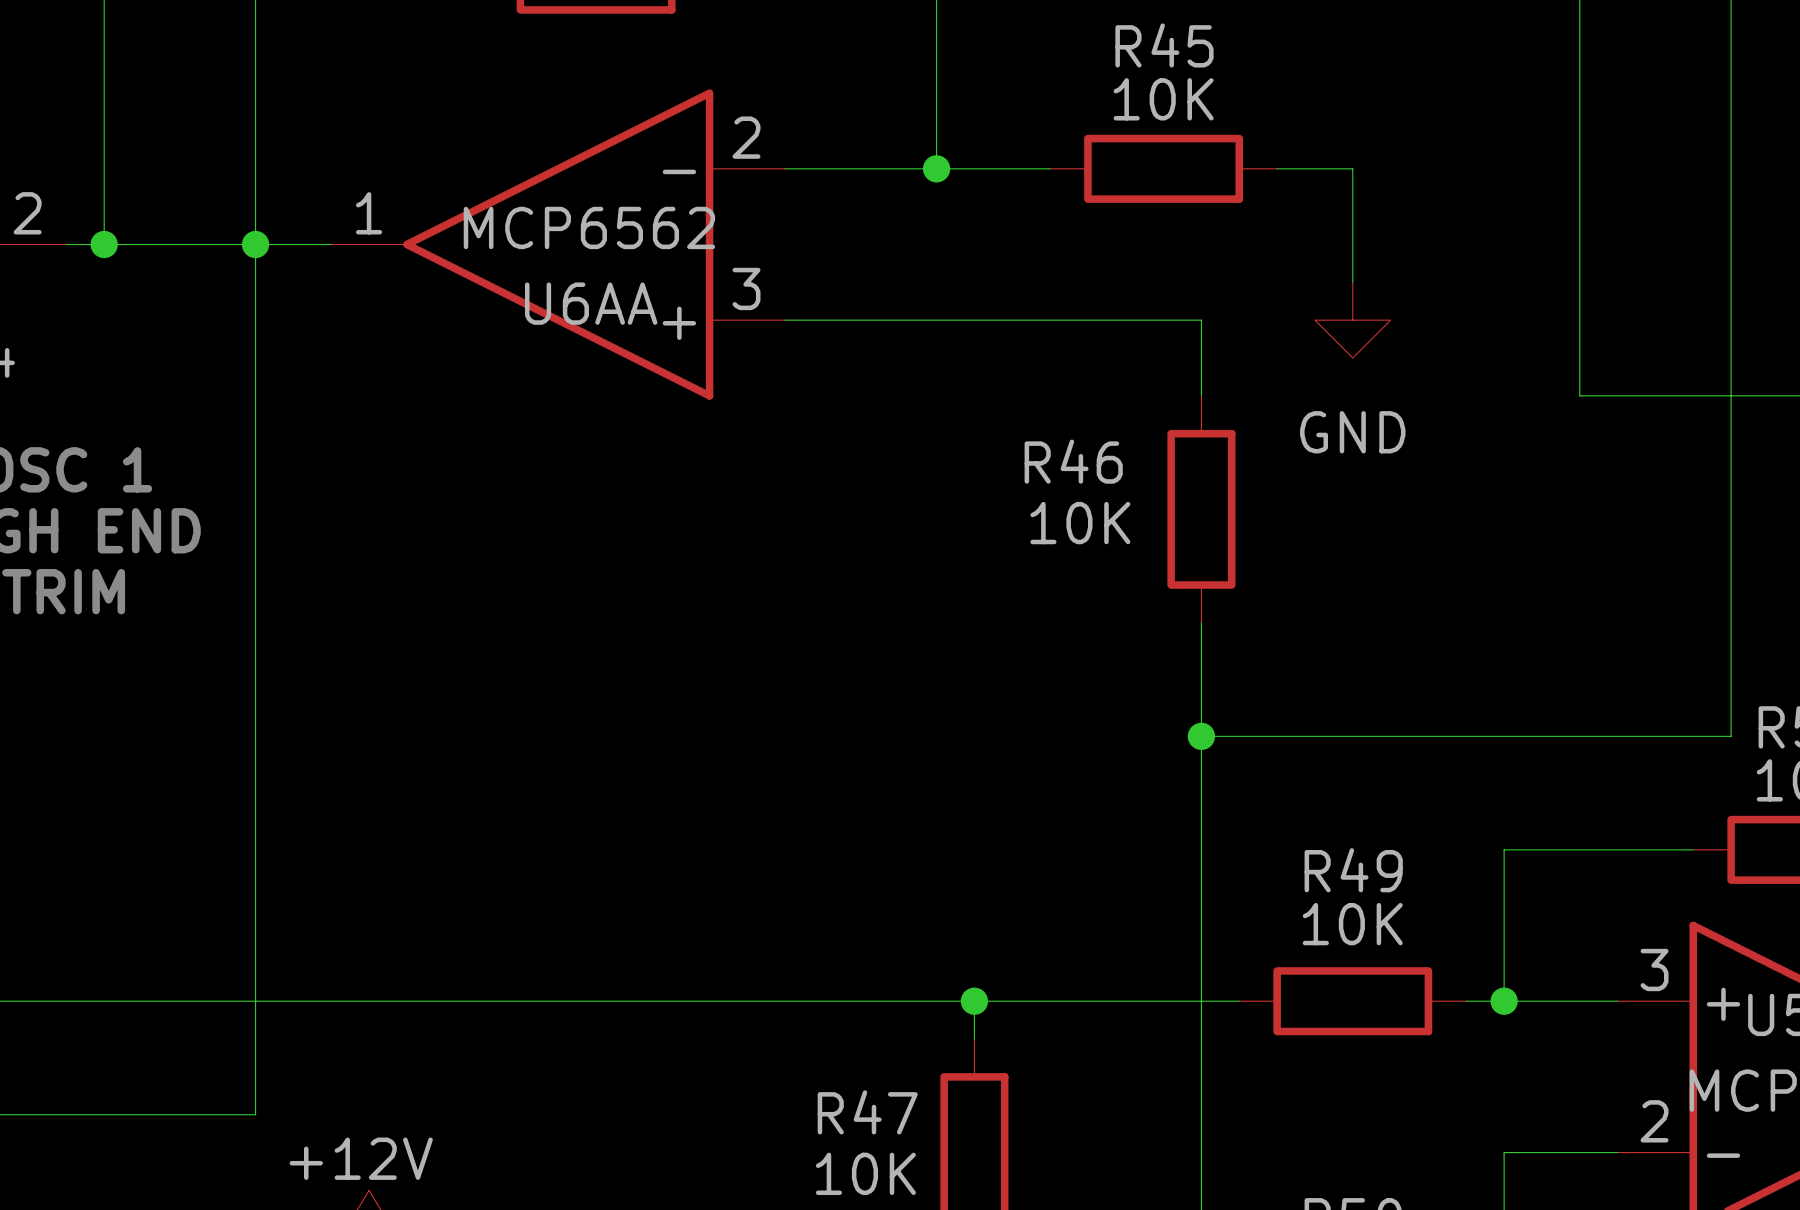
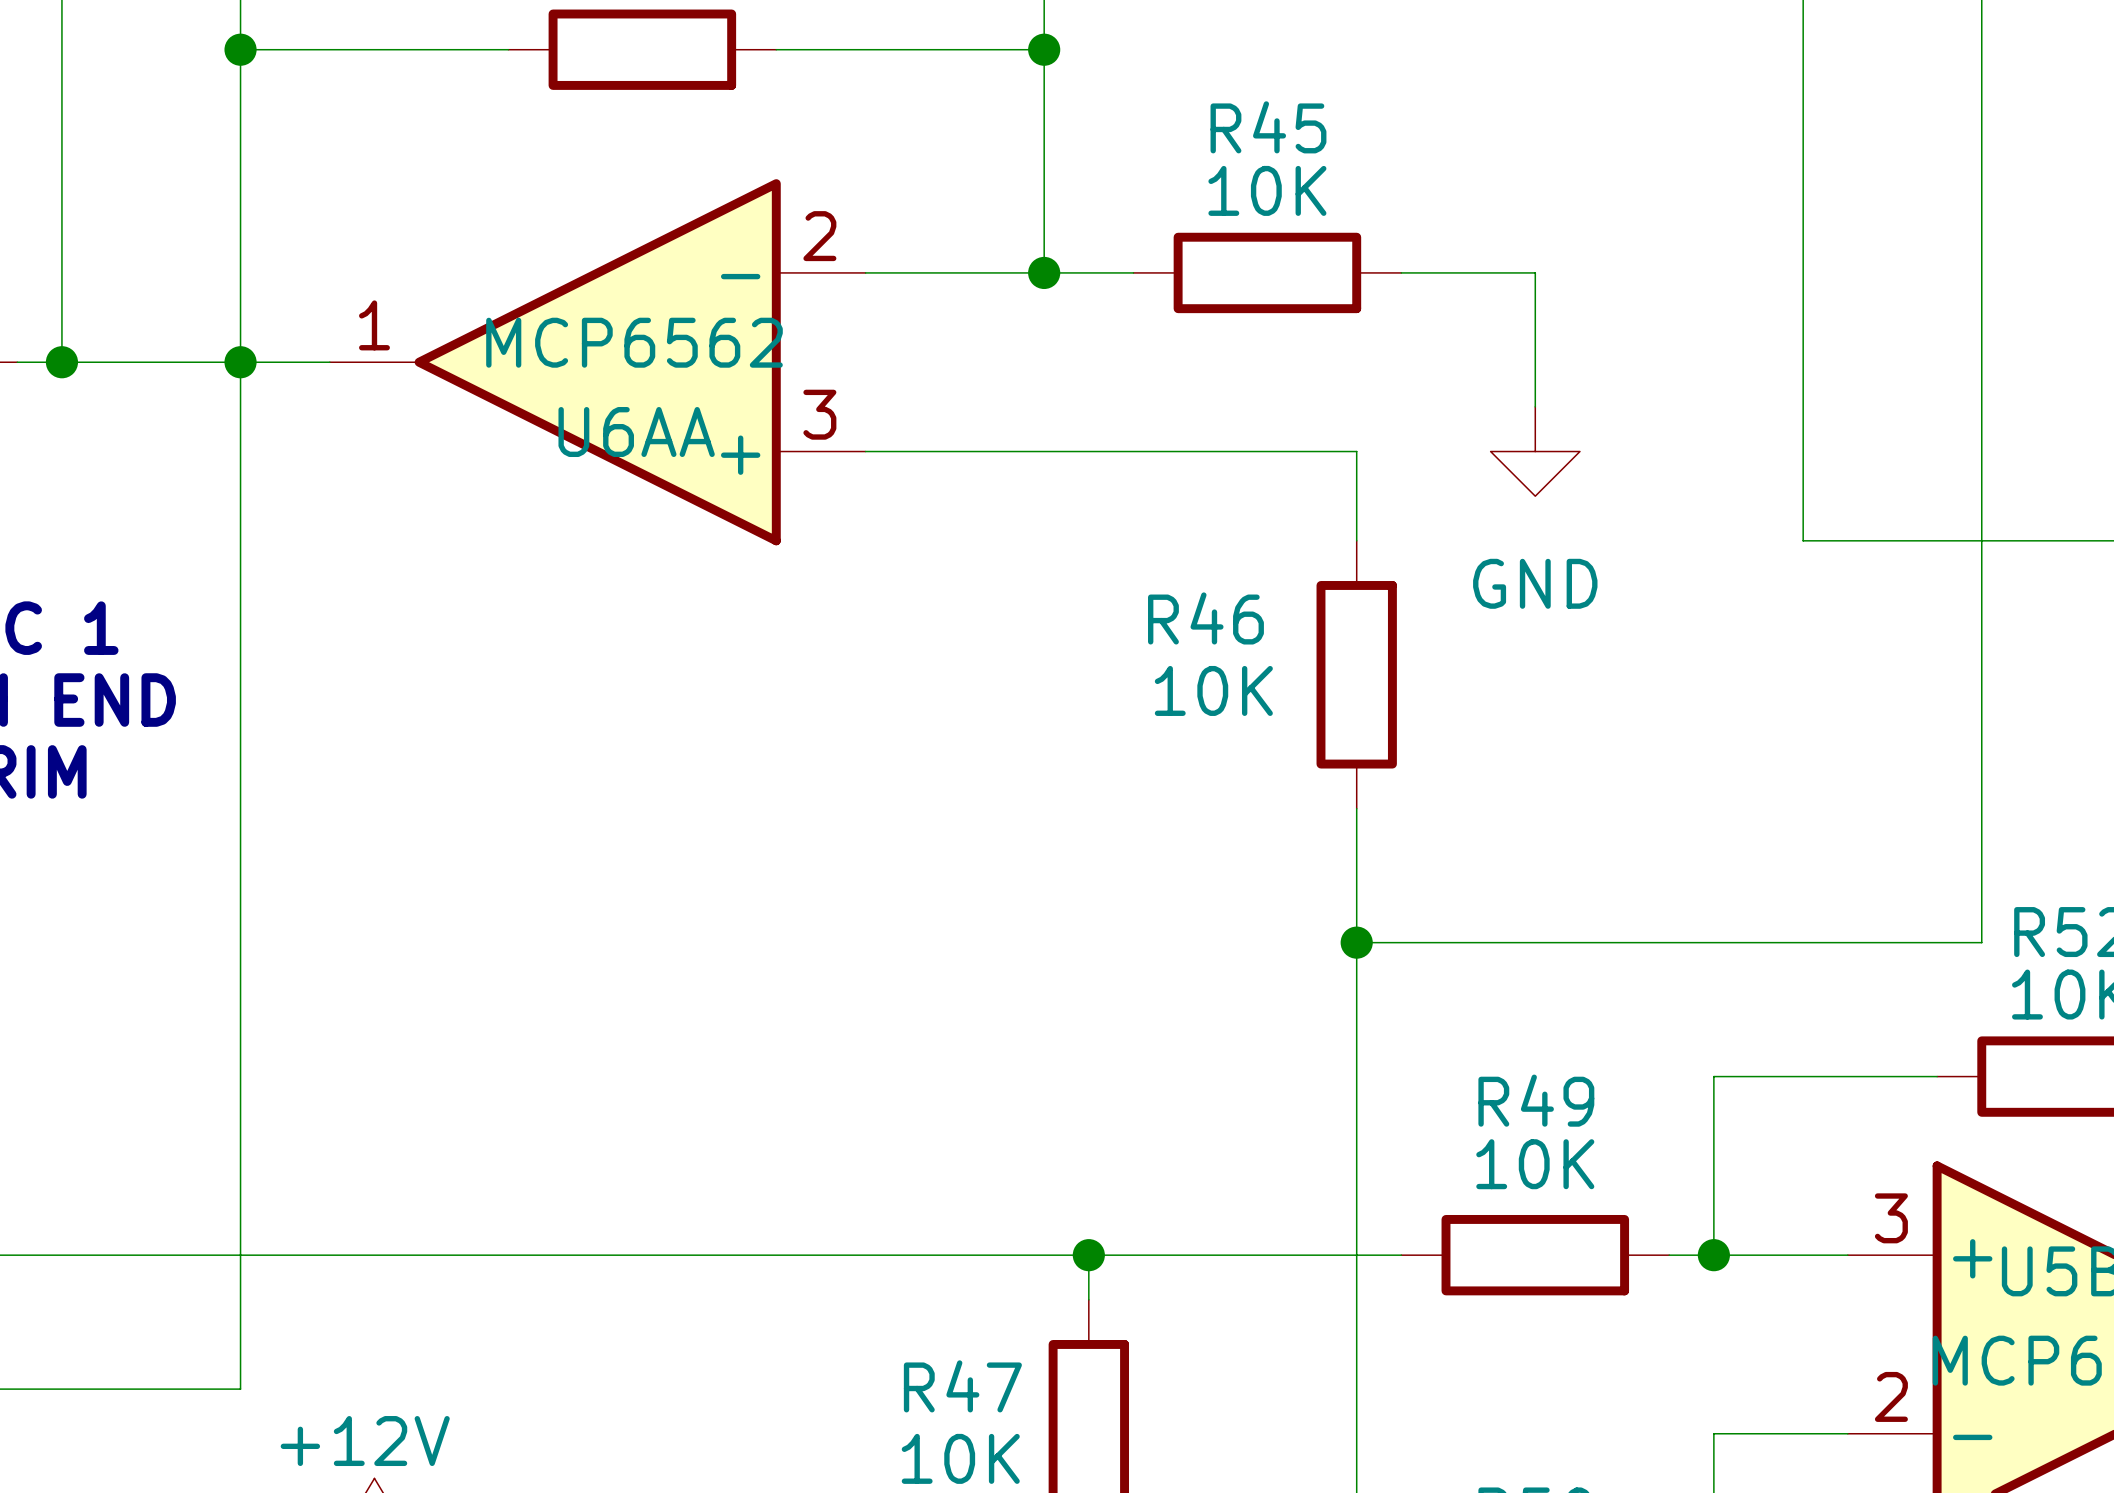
R45 position: (1163, 168) -> (1267, 272)

